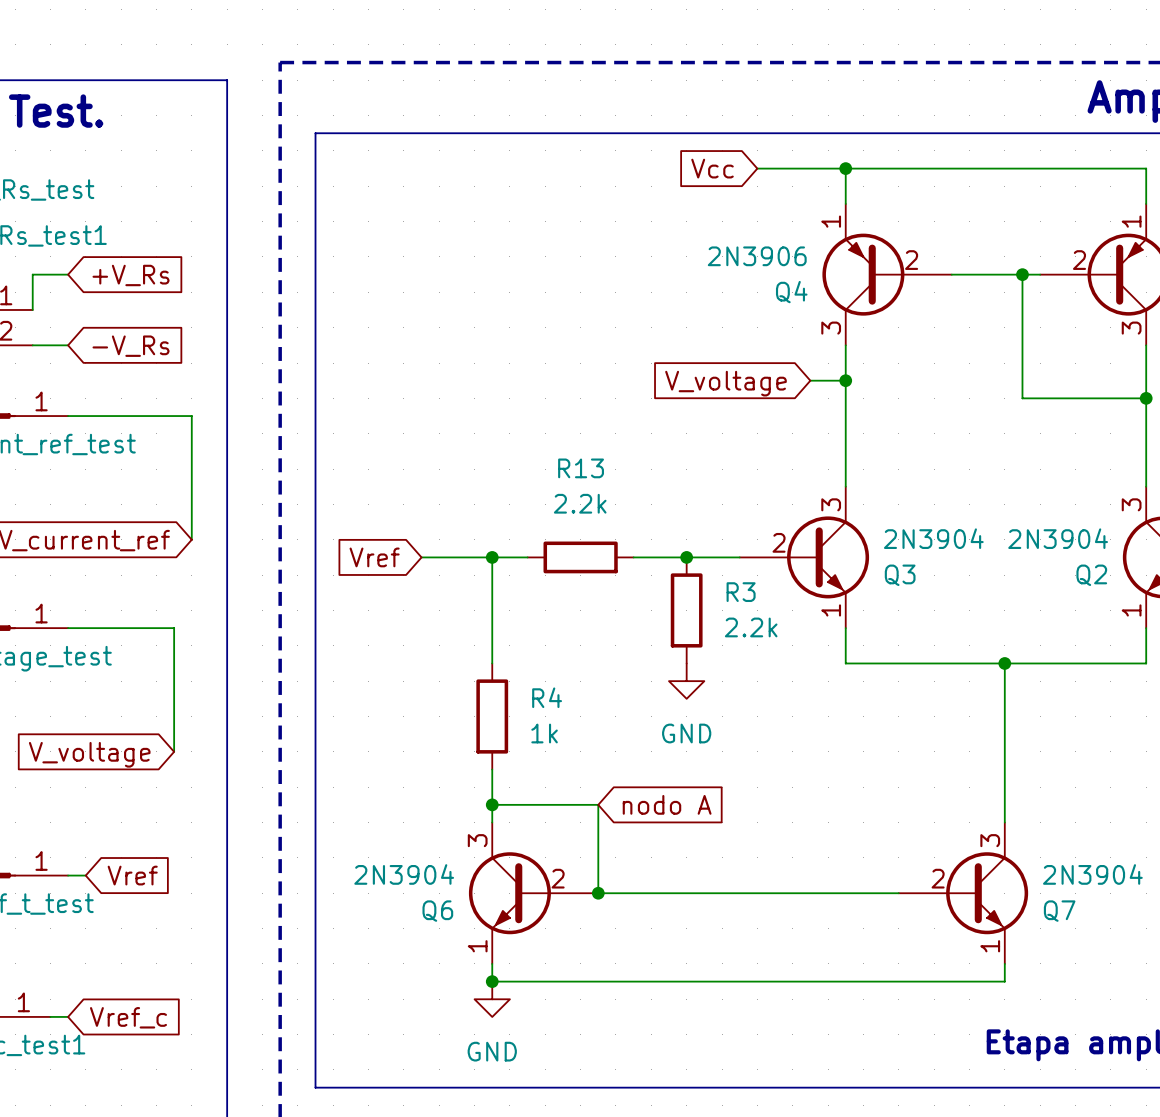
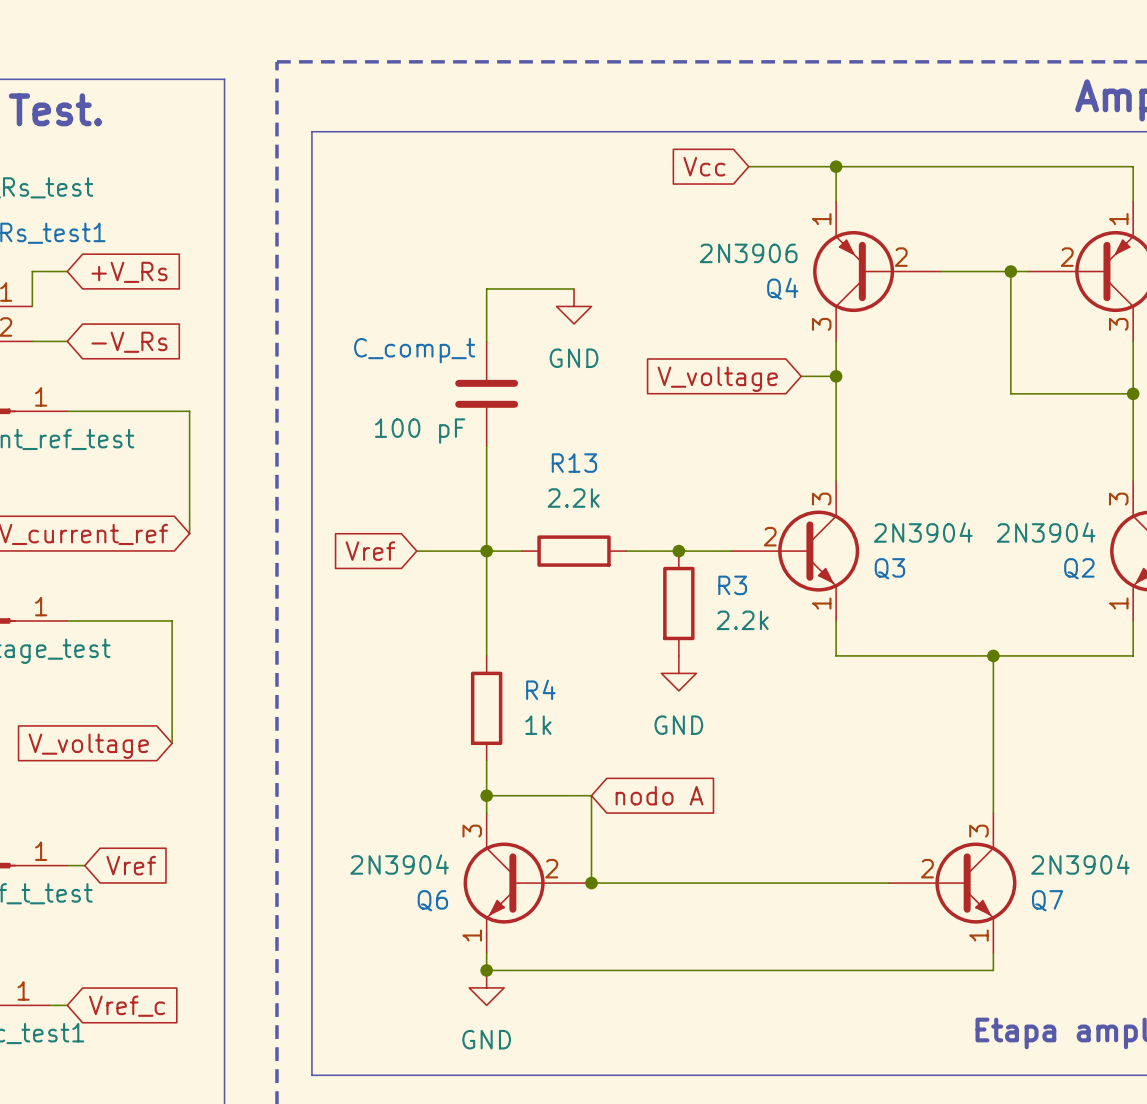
wire: none -> (574, 288) (486, 288) (486, 341)
power symbol: none -> GND (574, 306)
C_comp_t: none -> 100 pF (486, 393)
wire: none -> (486, 446) (486, 551)

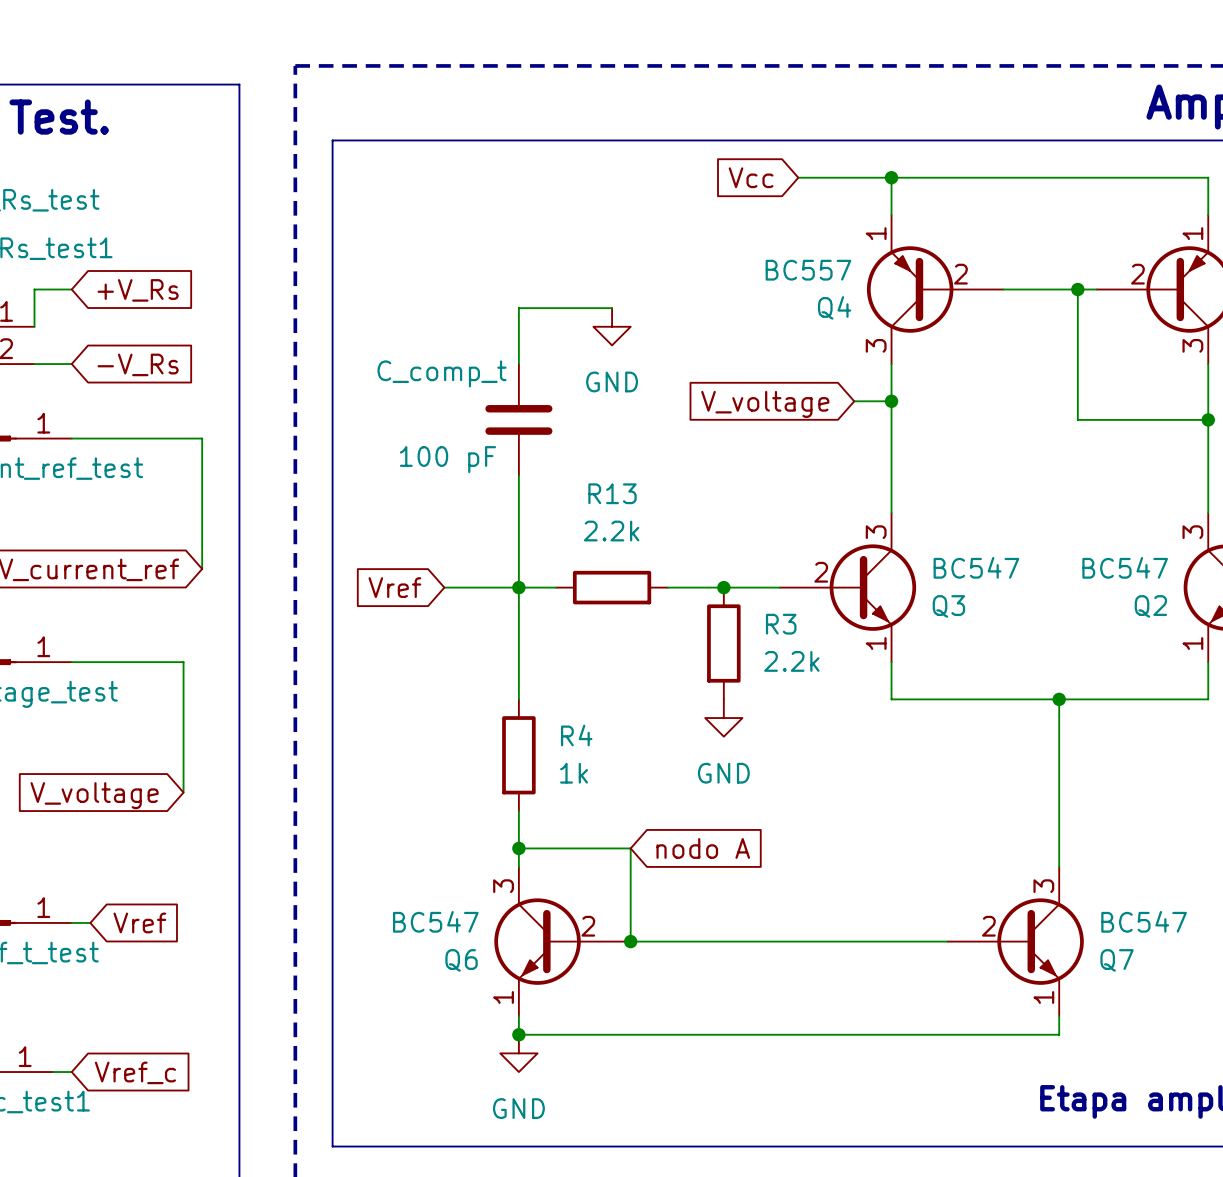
Q4 value: 2N3906 (748, 253) -> BC557 (808, 270)
Q3 value: 2N3904 (923, 532) -> BC547 (976, 567)
Q2 value: 2N3904 (1046, 532) -> BC547 (1125, 567)
Q6 value: 2N3904 (399, 864) -> BC547 (435, 921)
Q7 value: 2N3904 (1080, 864) -> BC547 (1144, 921)

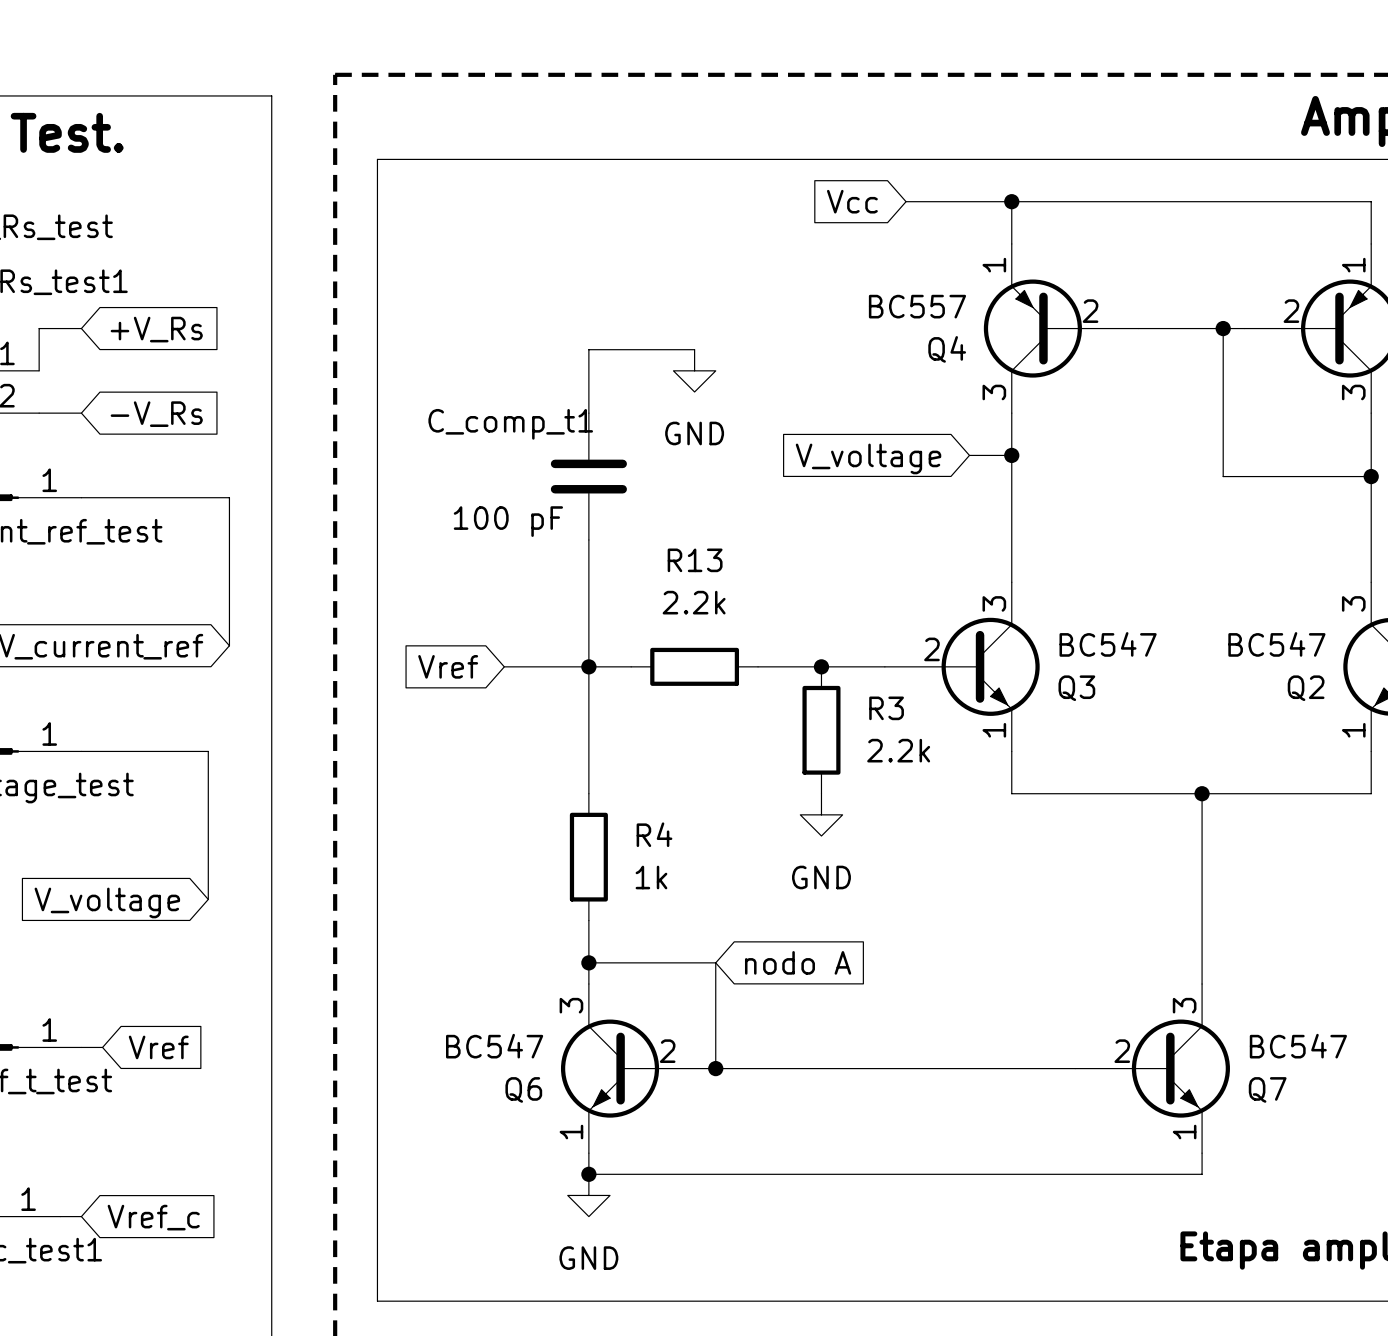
C_comp_t name: C_comp_t (442, 373) -> C_comp_t1 (510, 424)

